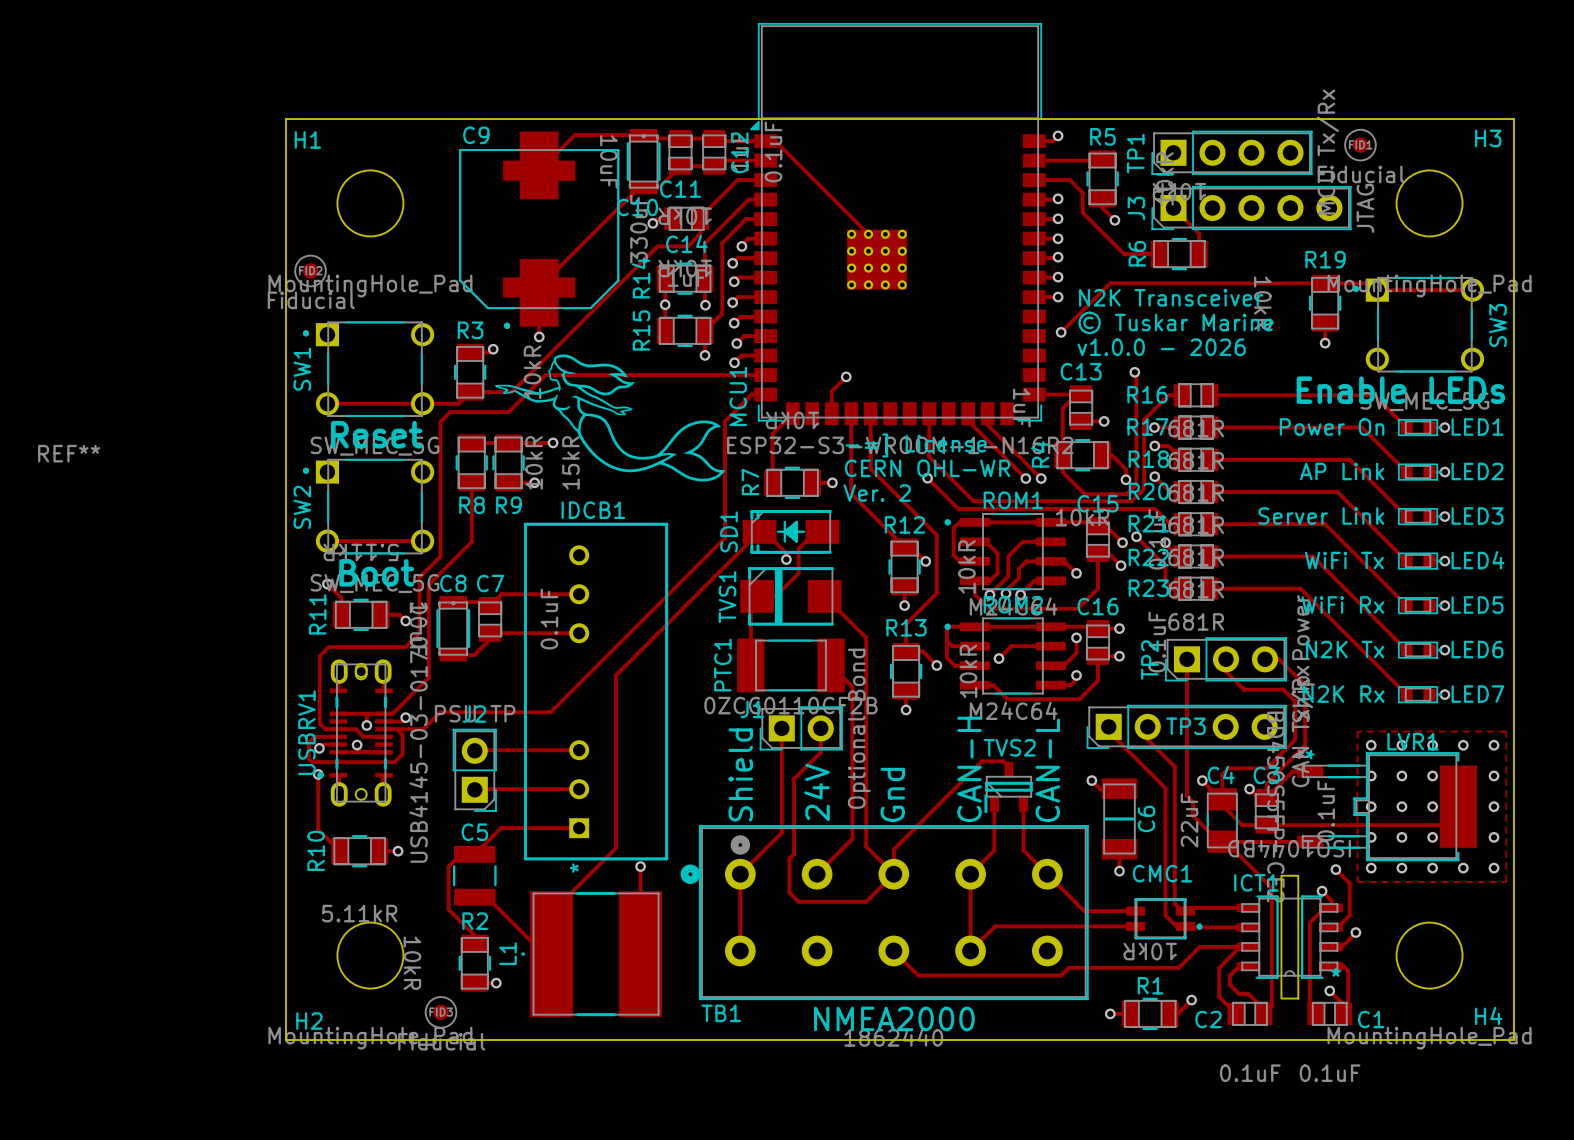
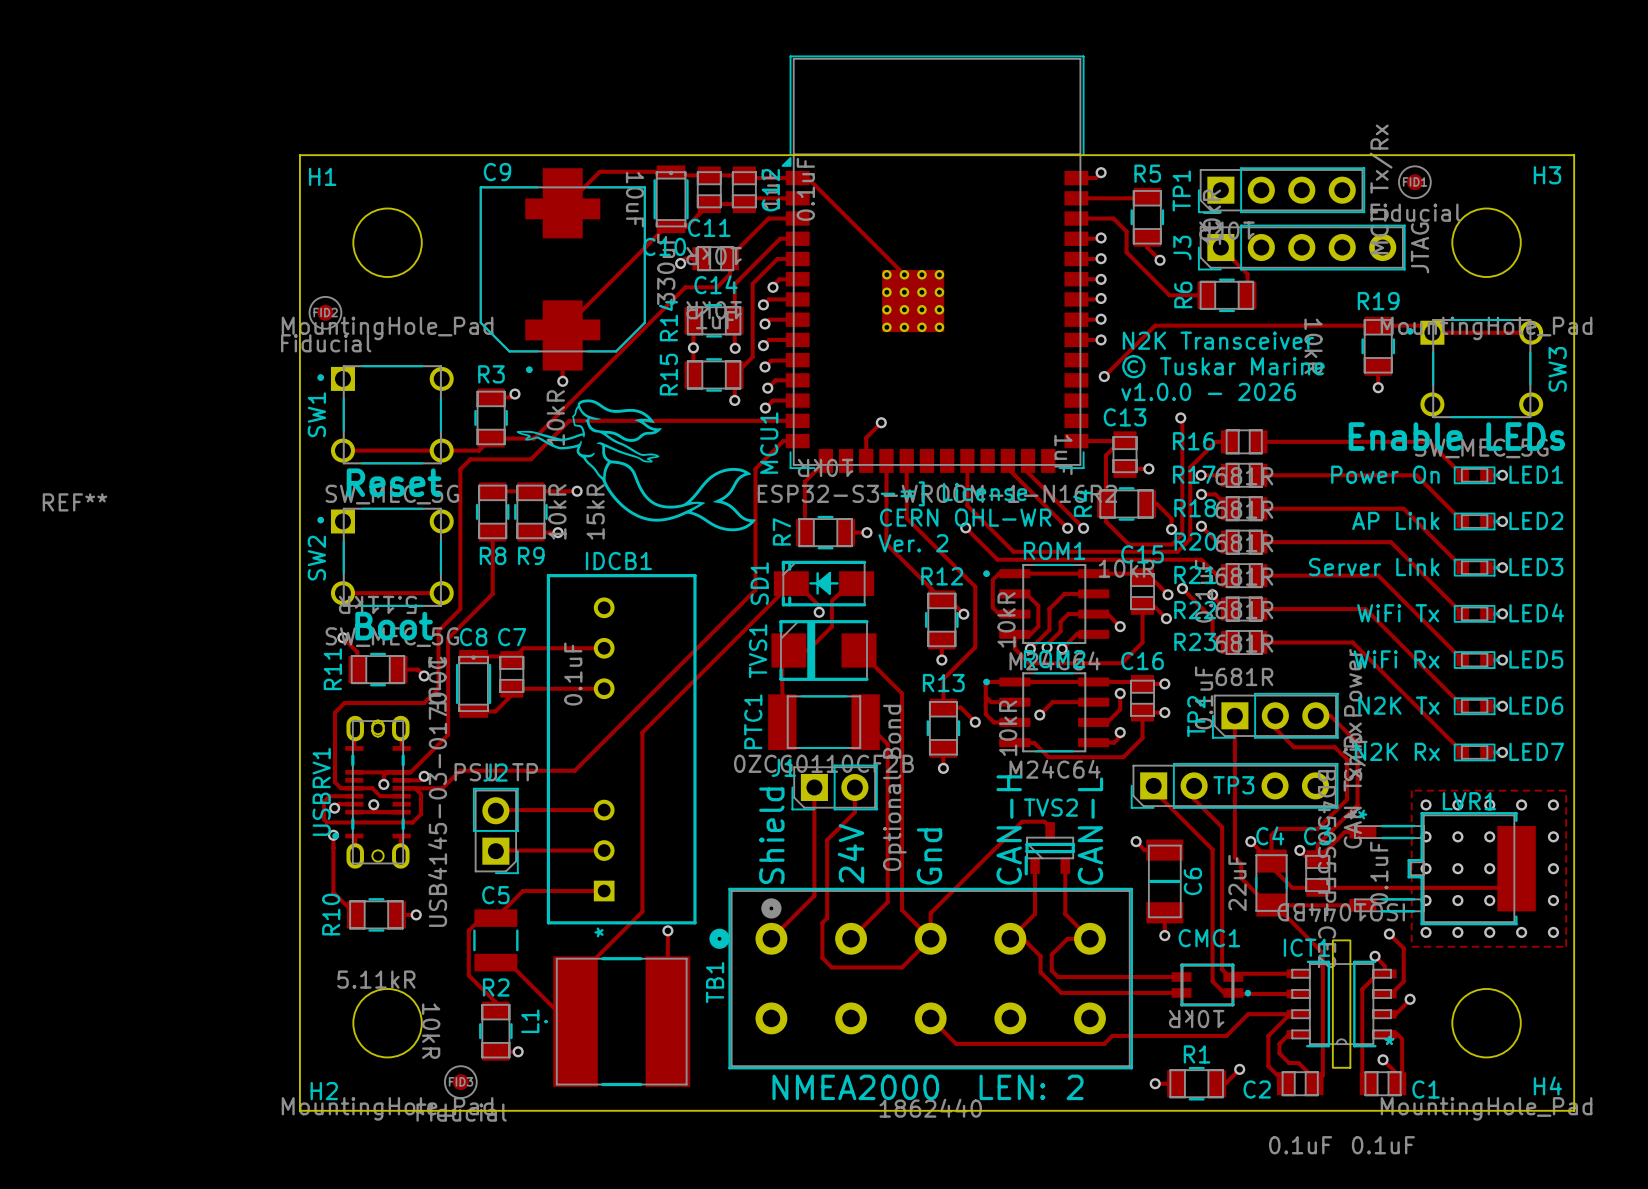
track: (740, 874) (740, 950) -> none
track: (970, 874) (970, 950) (995, 926) (1019, 926) -> (1010, 938) (1023, 938) (1040, 956) (1040, 972) (1061, 992)
track: (1047, 874) (1084, 911) -> (1089, 938) (1067, 938) (1051, 954) (1051, 970) (1058, 977) (1128, 977)
TB1 name rotation: 0° (721, 1013) -> 90° counterclockwise (715, 982)
TB1 name position: TB1 (721, 1013) -> TB1 (715, 982)
text: NMEA2000 (894, 1018) -> NMEA2000 LEN: 2 (928, 1087)

